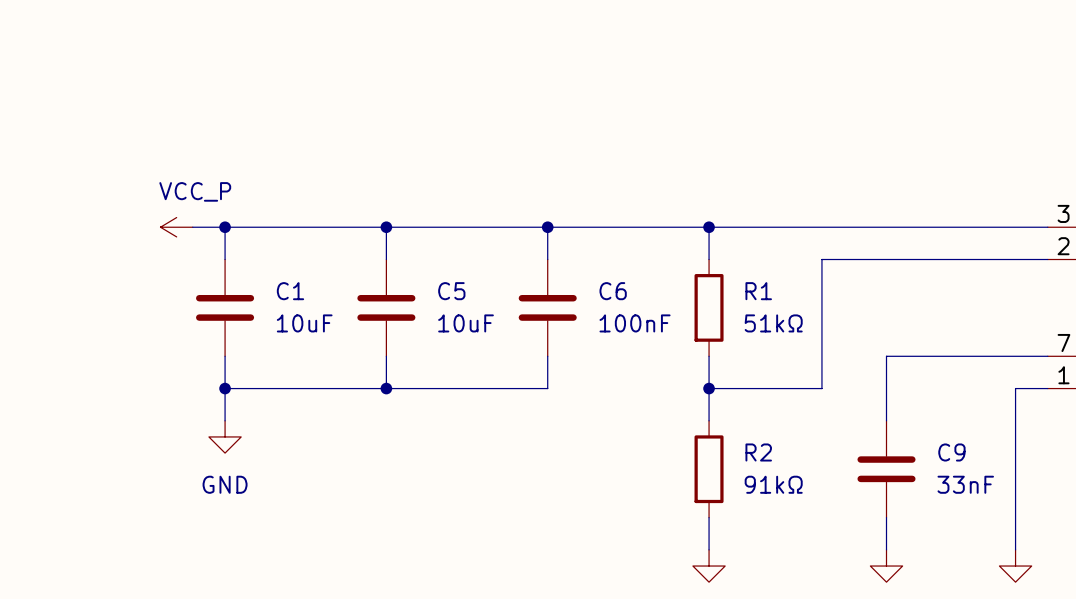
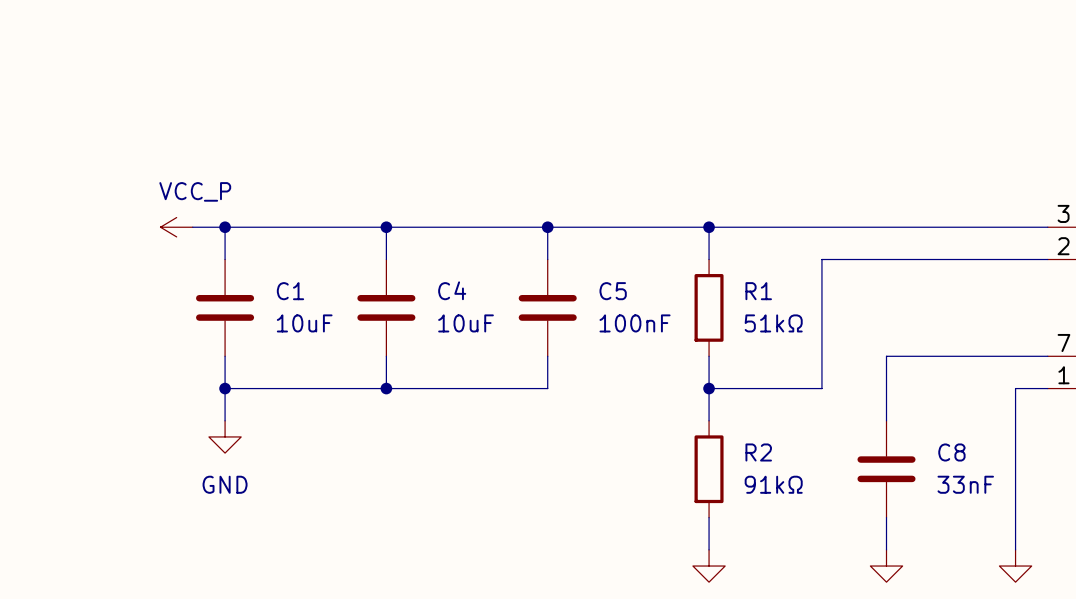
C5 name: C5 (451, 291) -> C4 (452, 290)
C6 name: C6 (613, 291) -> C5 (613, 291)
C9 name: C9 (951, 452) -> C8 (951, 452)

